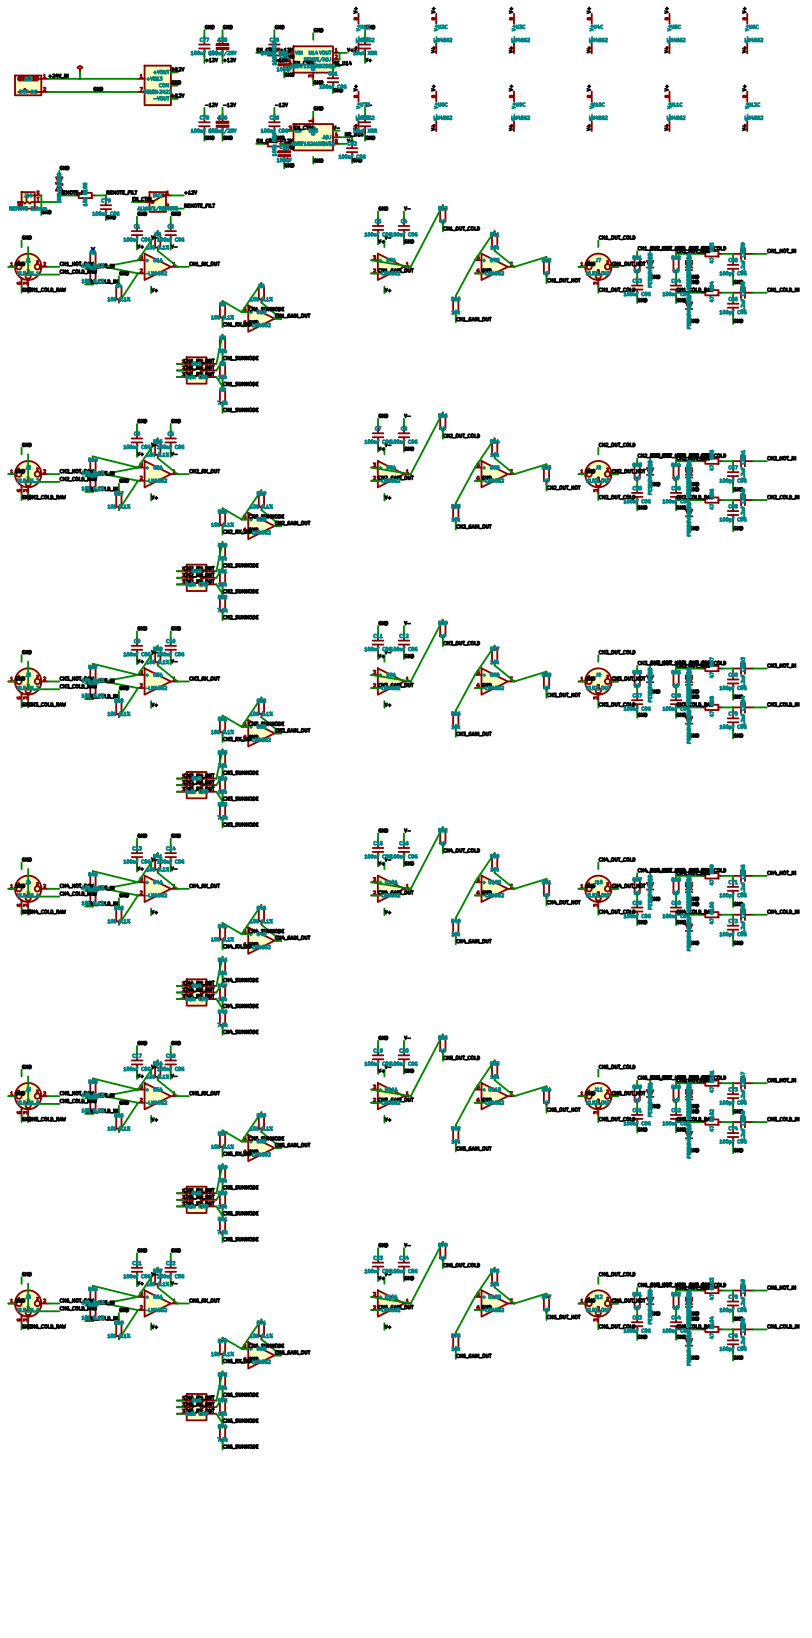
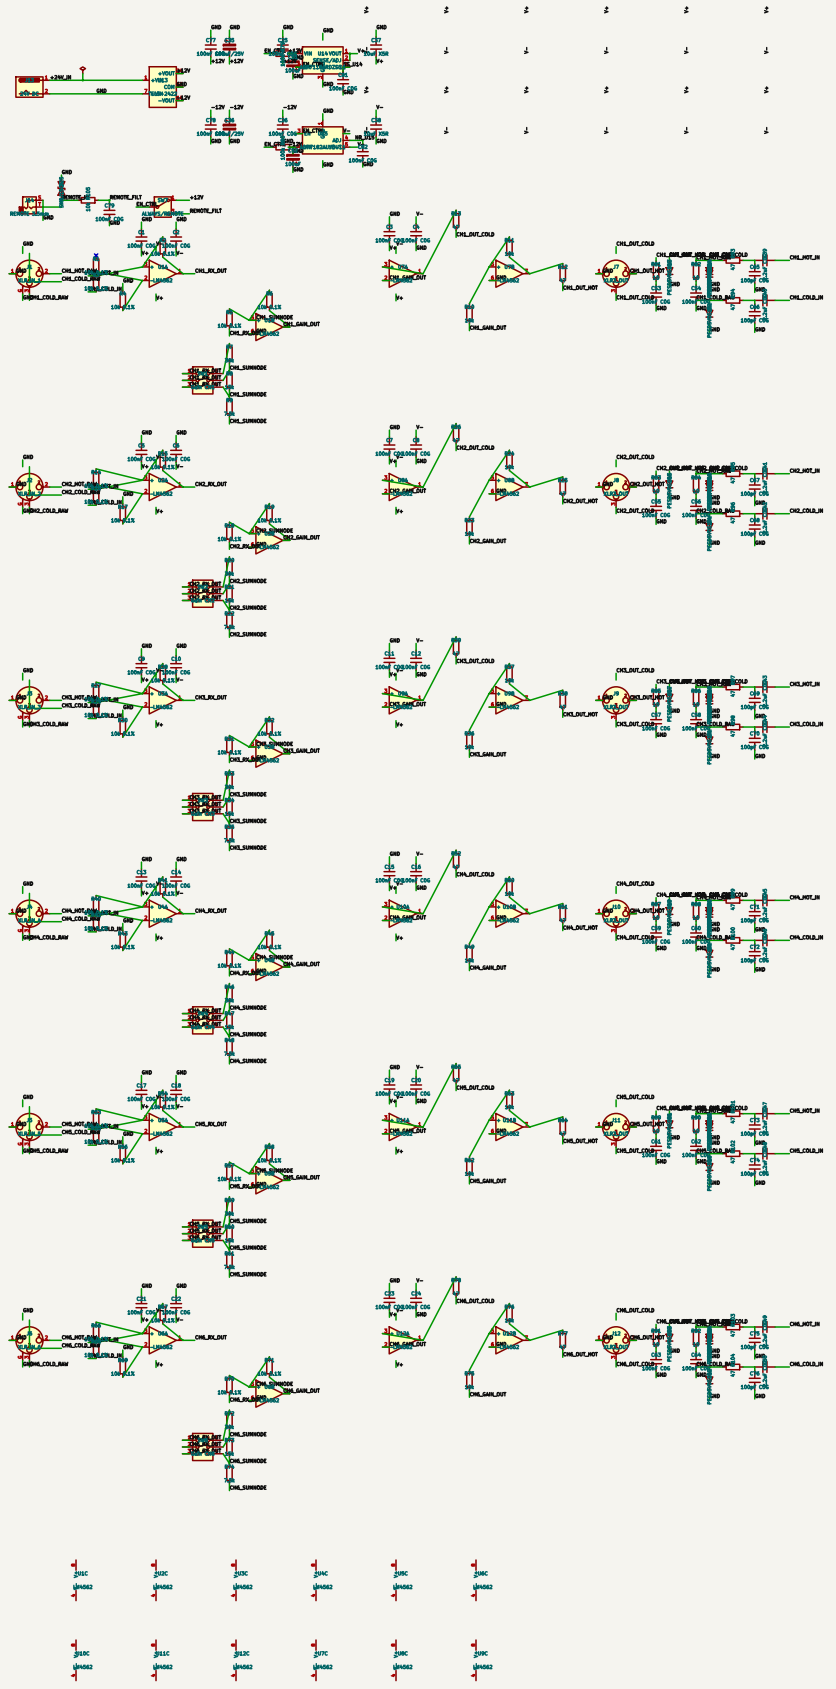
part position: (358, 33) -> (76, 1580)
part position: (436, 33) -> (156, 1580)
part position: (513, 33) -> (236, 1580)
part position: (591, 33) -> (316, 1580)
part position: (669, 33) -> (396, 1580)
part position: (747, 33) -> (475, 1580)
part position: (358, 111) -> (316, 1660)
part position: (436, 111) -> (396, 1660)
part position: (513, 111) -> (475, 1660)
part position: (591, 111) -> (76, 1660)
part position: (669, 111) -> (156, 1660)
part position: (747, 111) -> (236, 1660)

